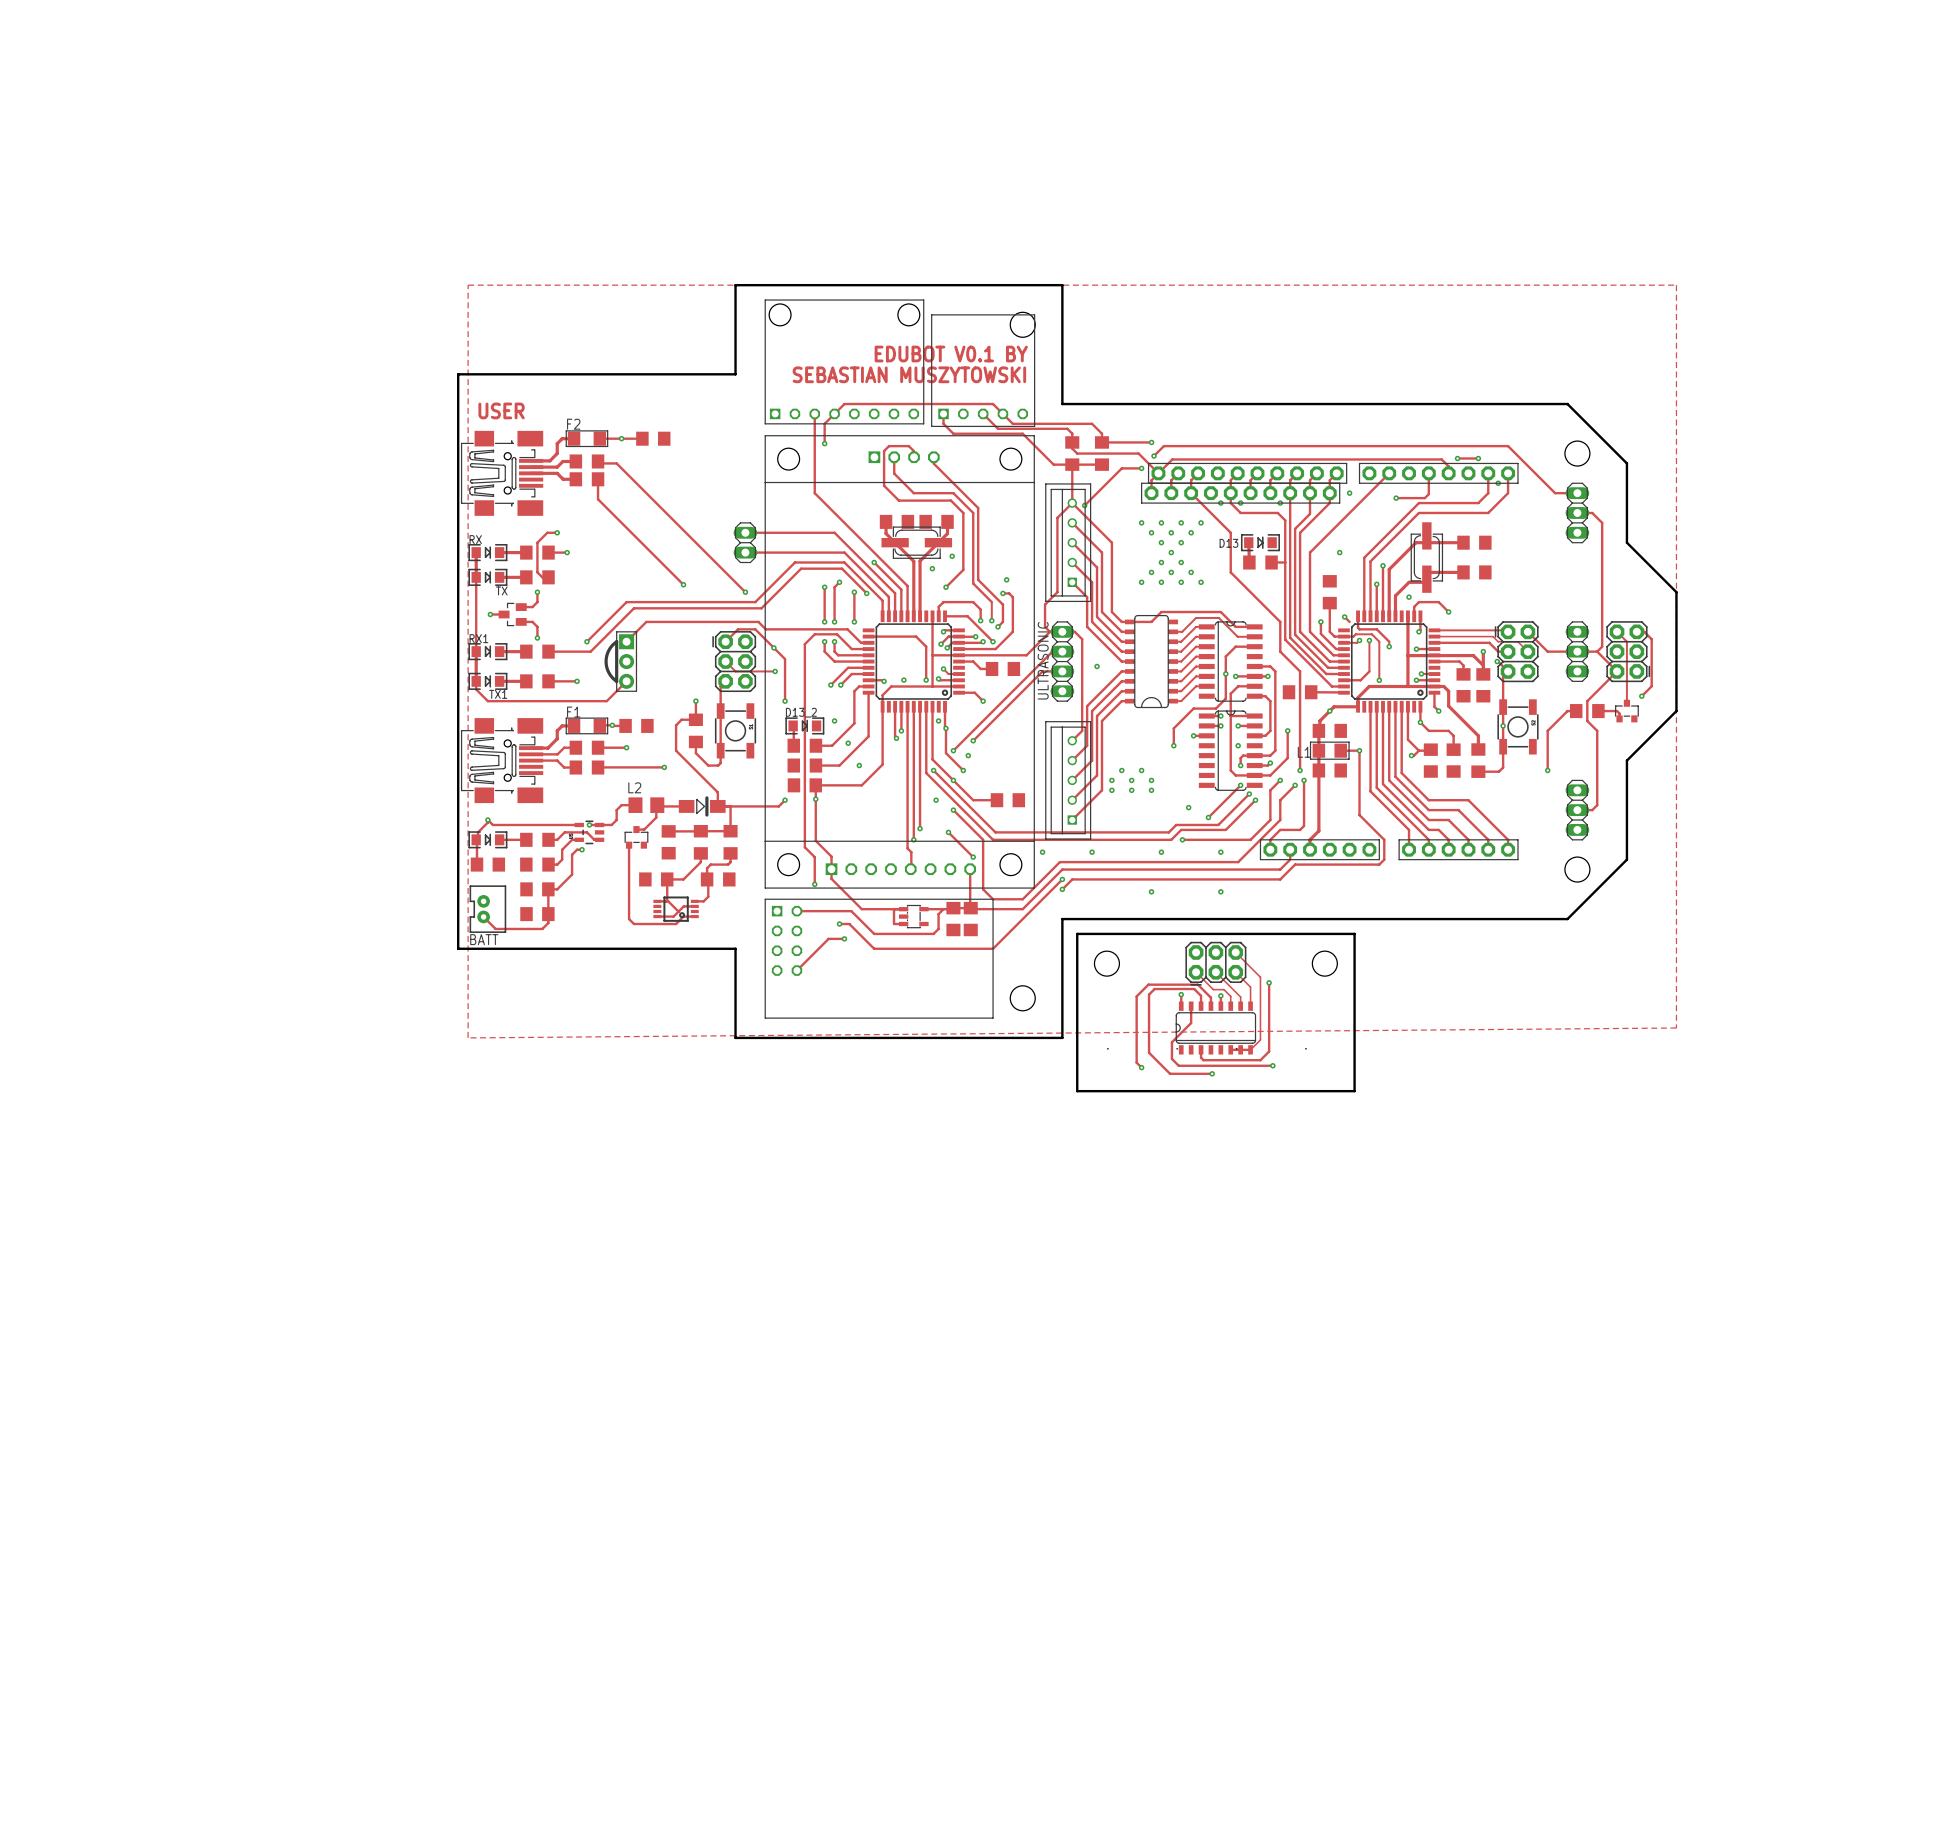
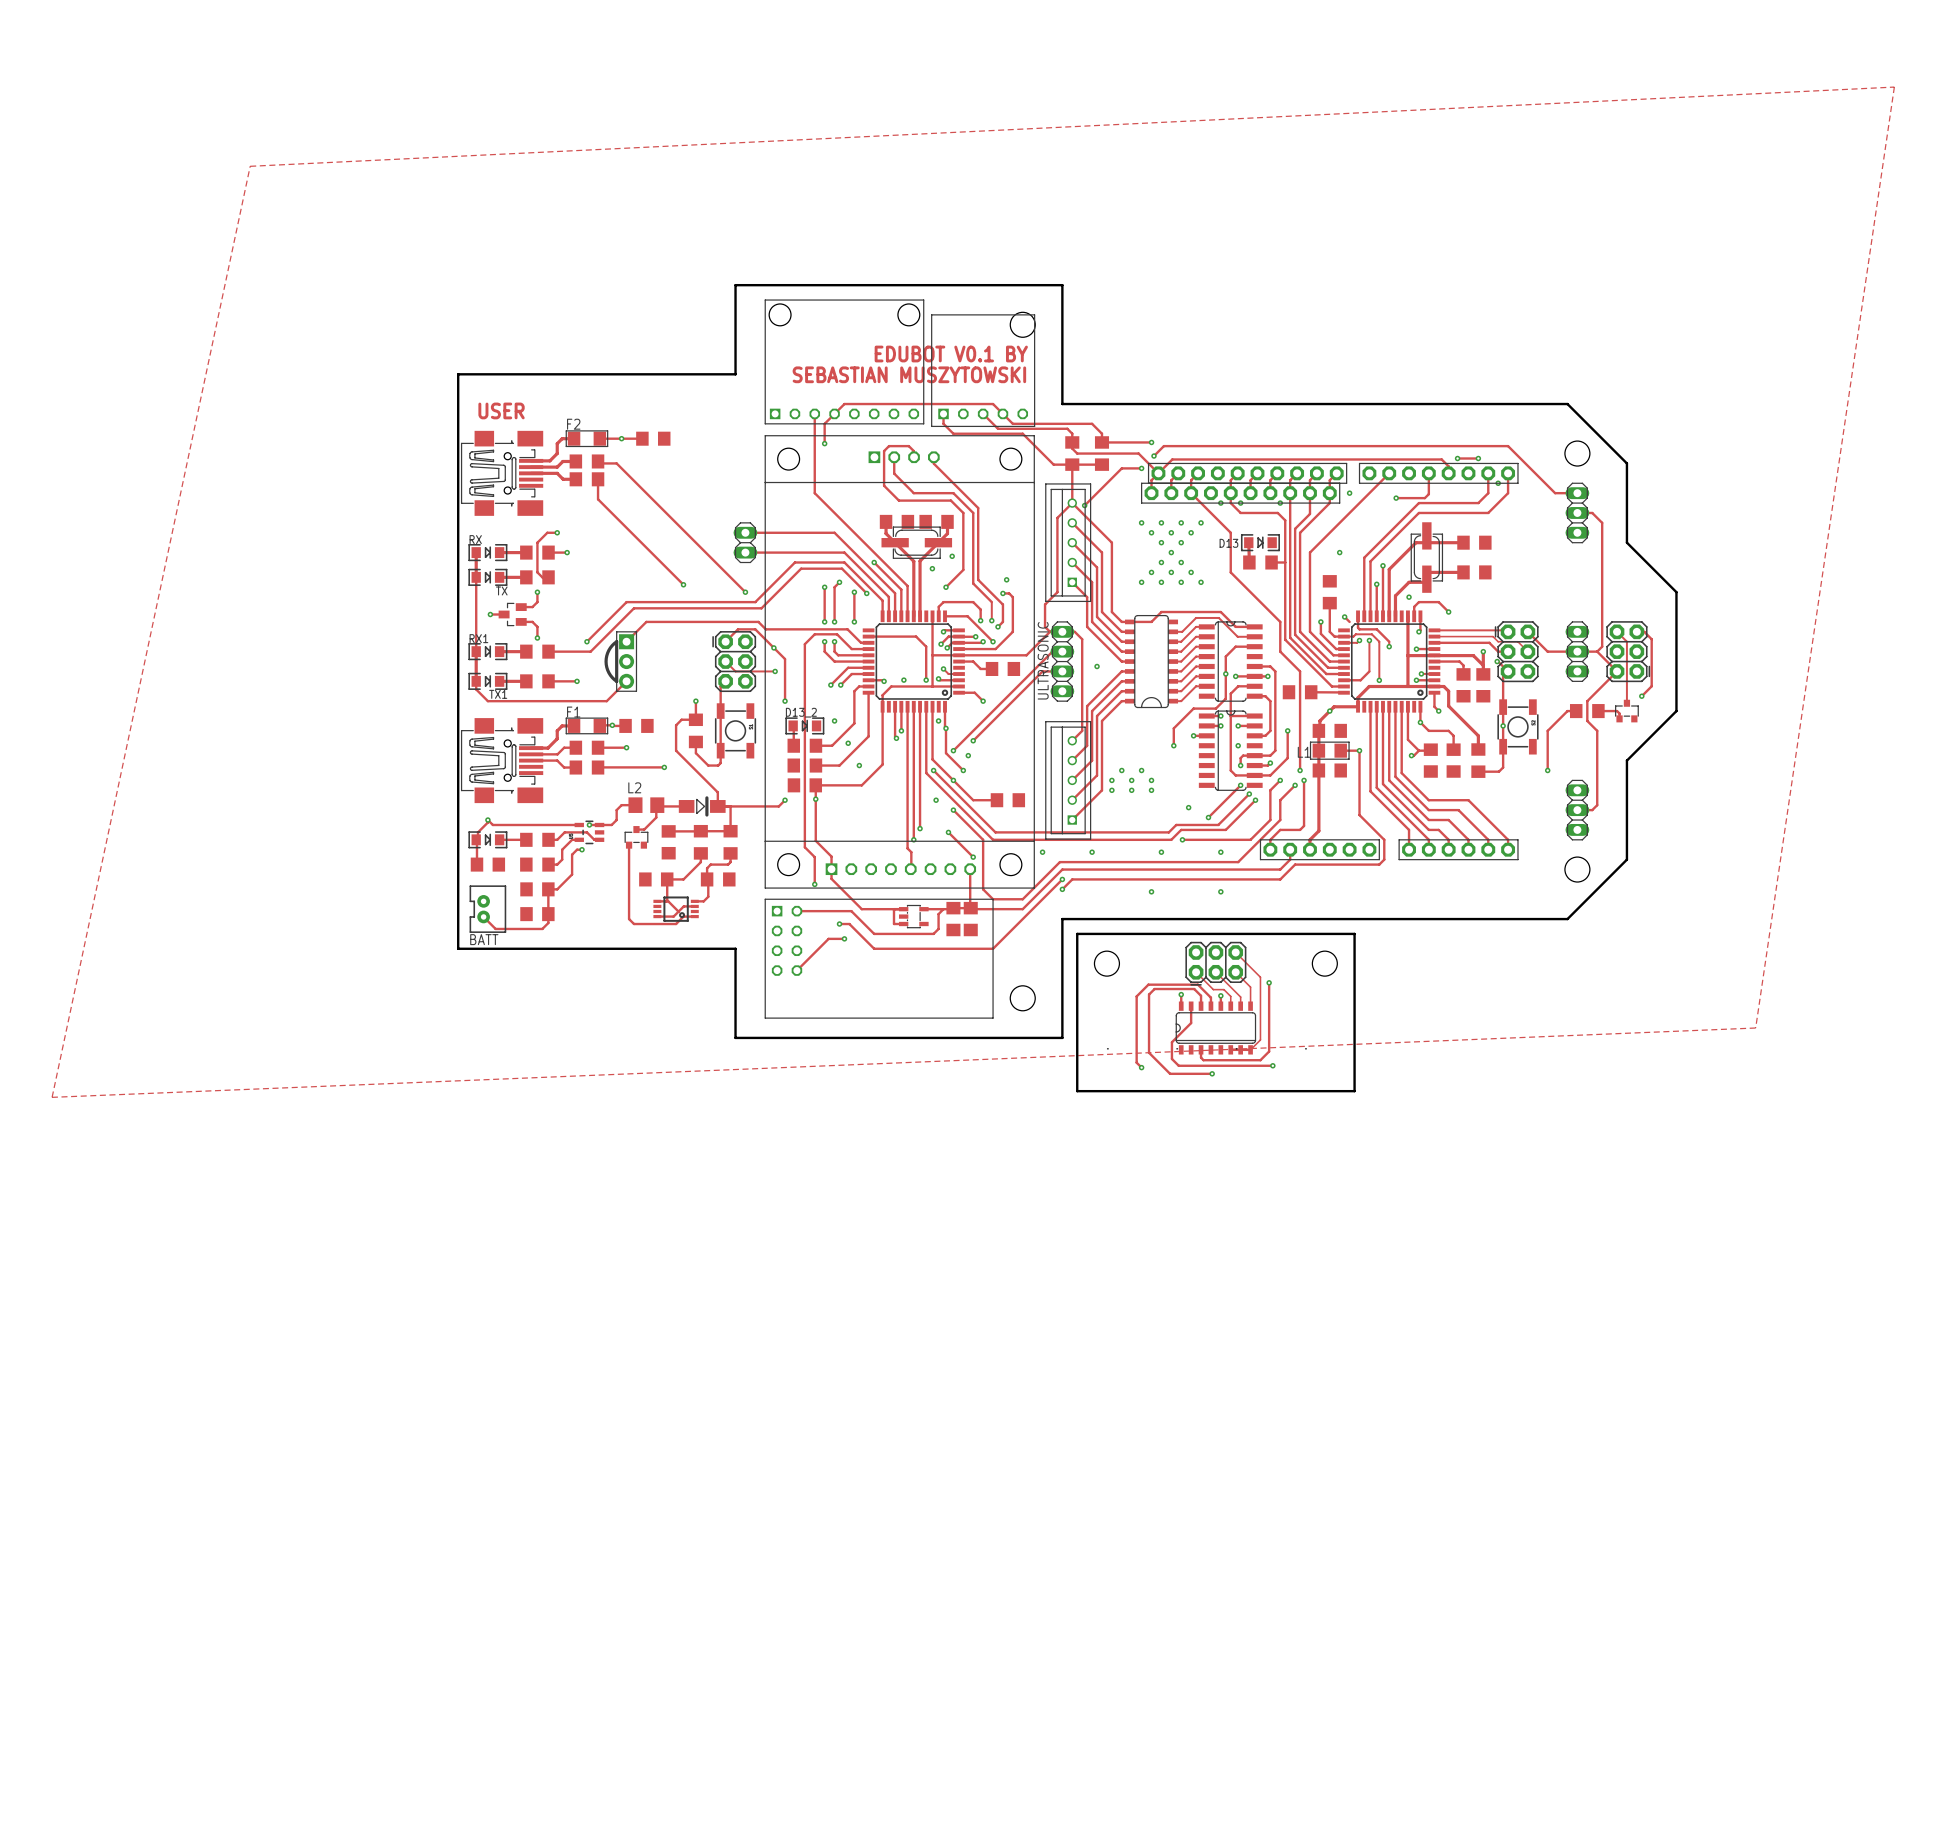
zone outline: none -> (1894, 87) (250, 166) (52, 1097) (1755, 1028) (1894, 87)
zone outline: (468, 285) (1676, 285) (1676, 1028) (468, 1037) (468, 285) -> none

